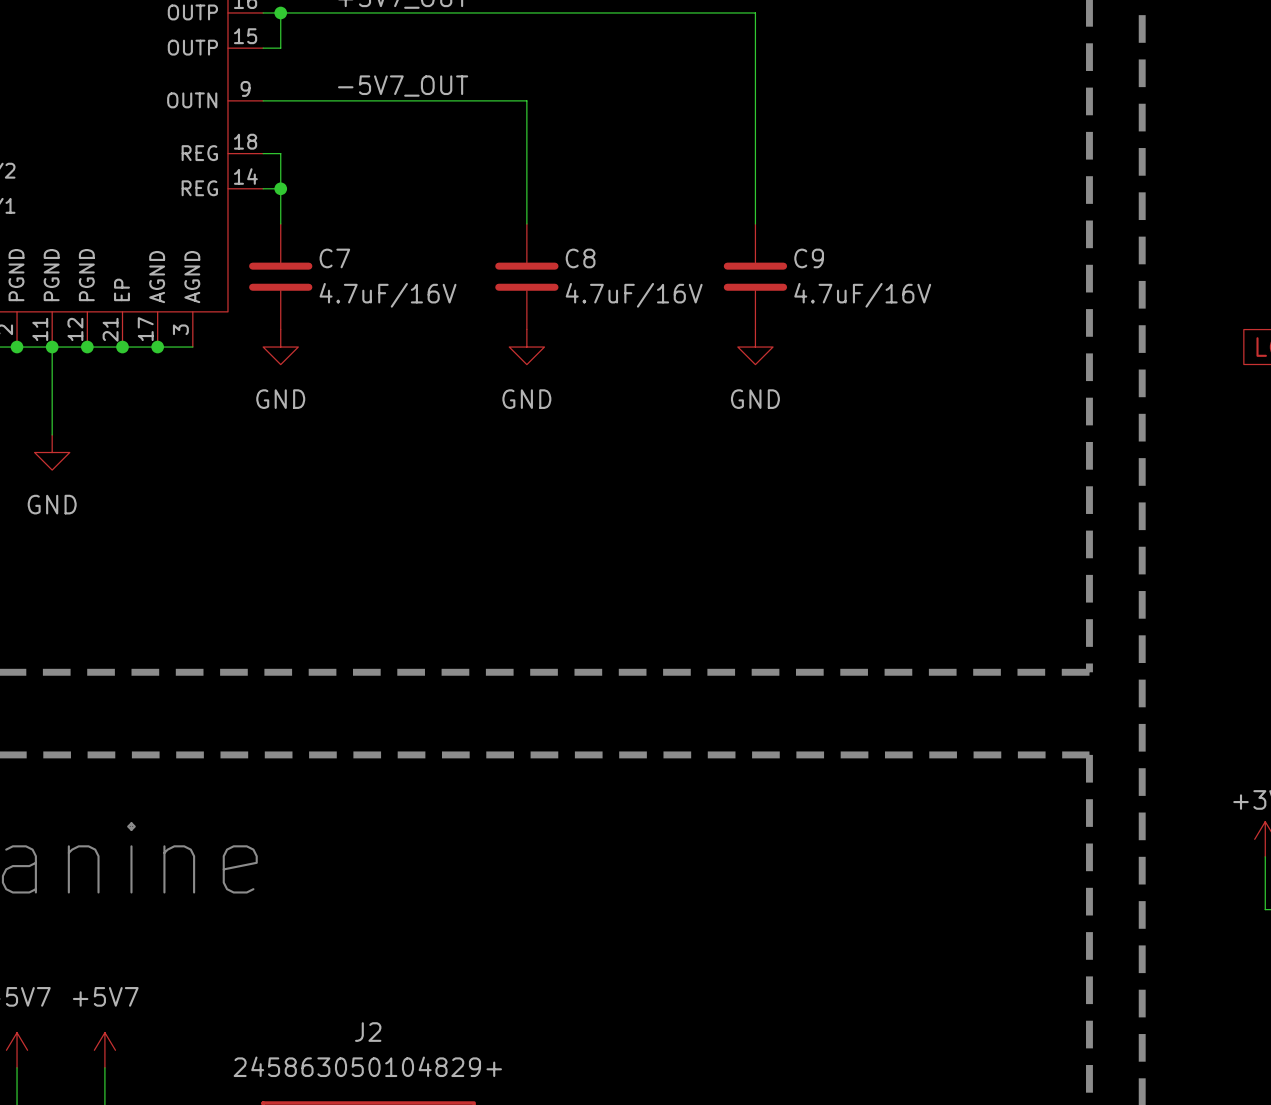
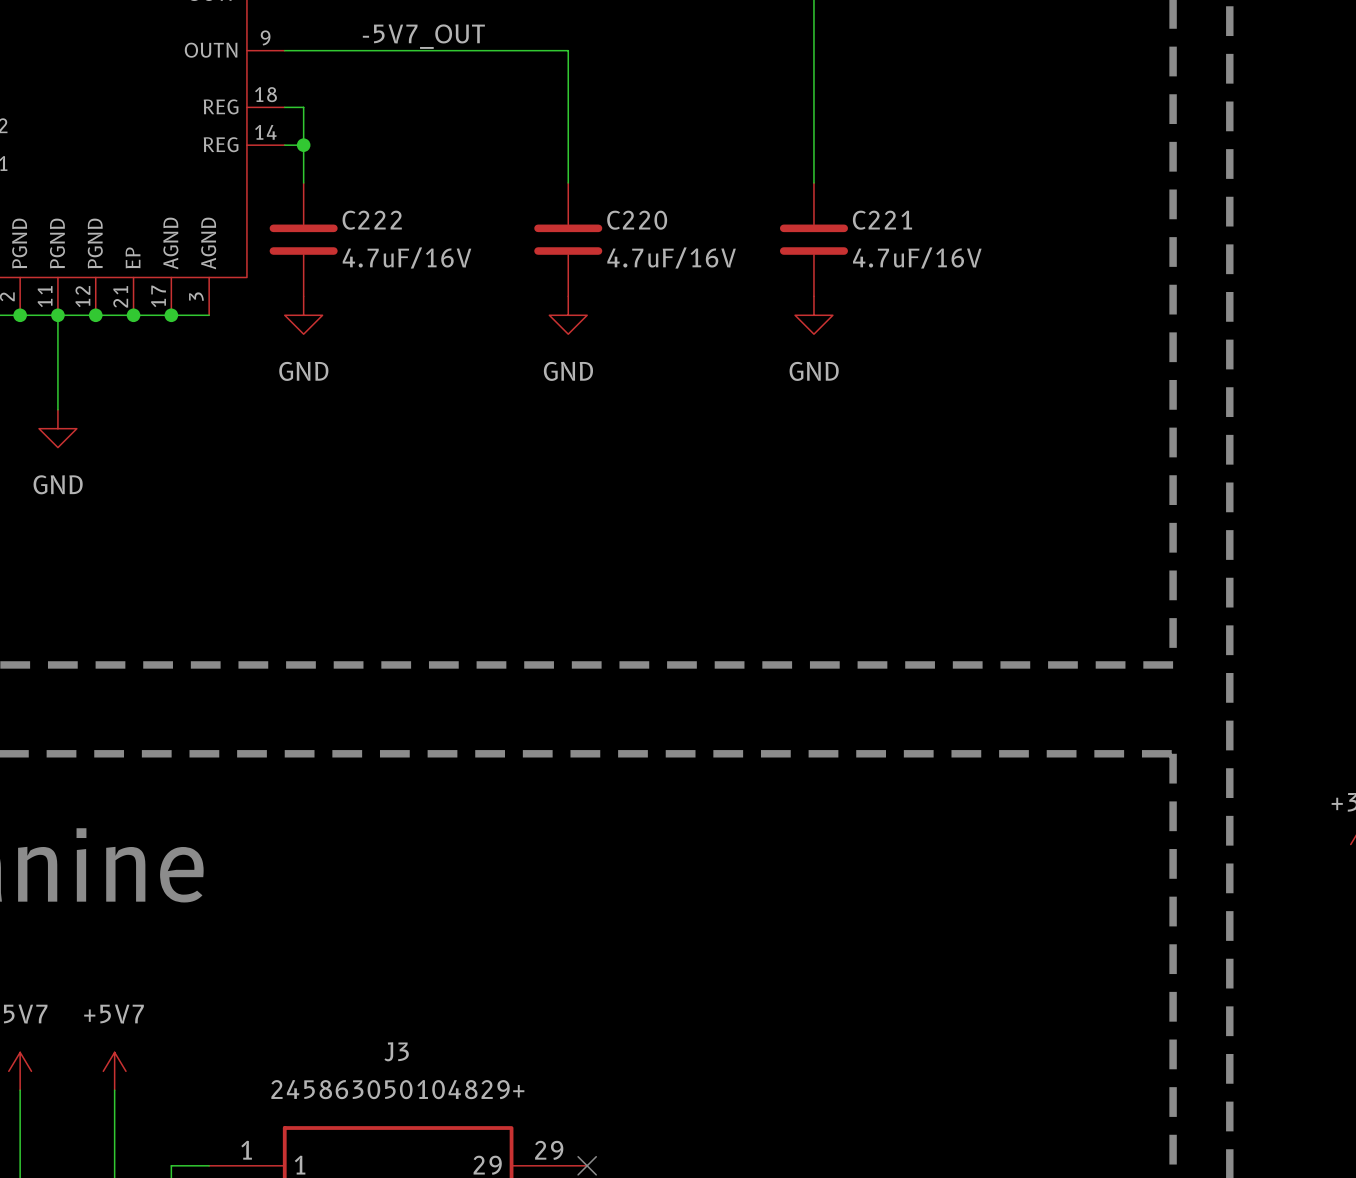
C7 name: C7 (334, 258) -> C222 (372, 220)
C8 name: C8 (580, 258) -> C220 (637, 220)
C9 name: C9 (809, 258) -> C221 (882, 220)
J2 name: J2 (368, 1032) -> J3 (396, 1051)

